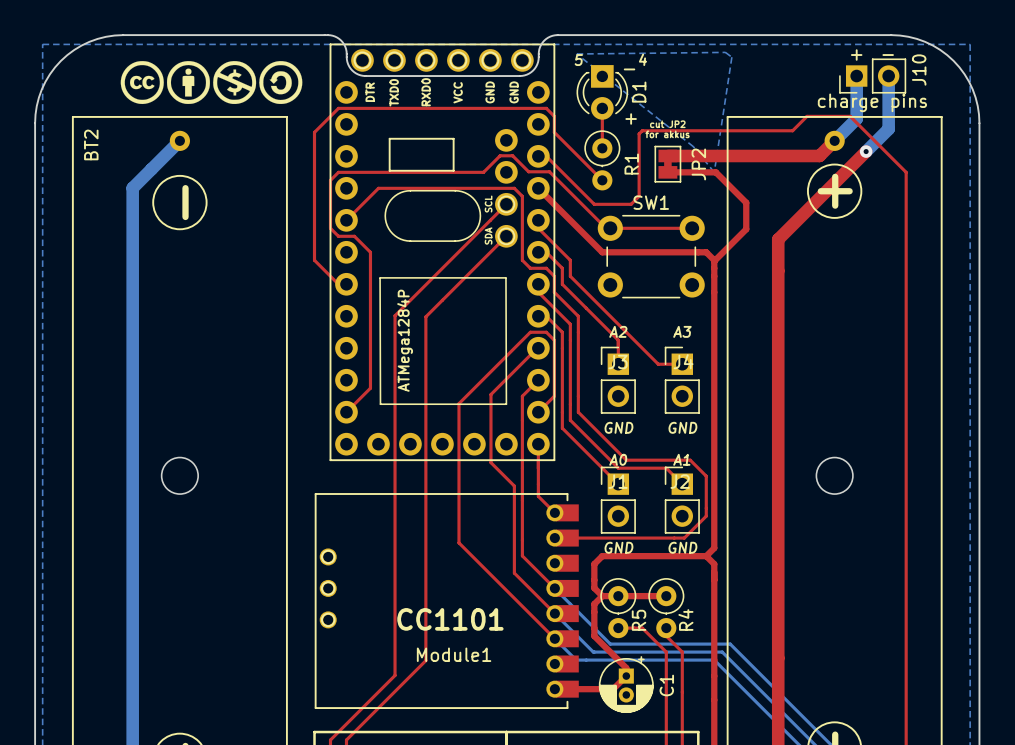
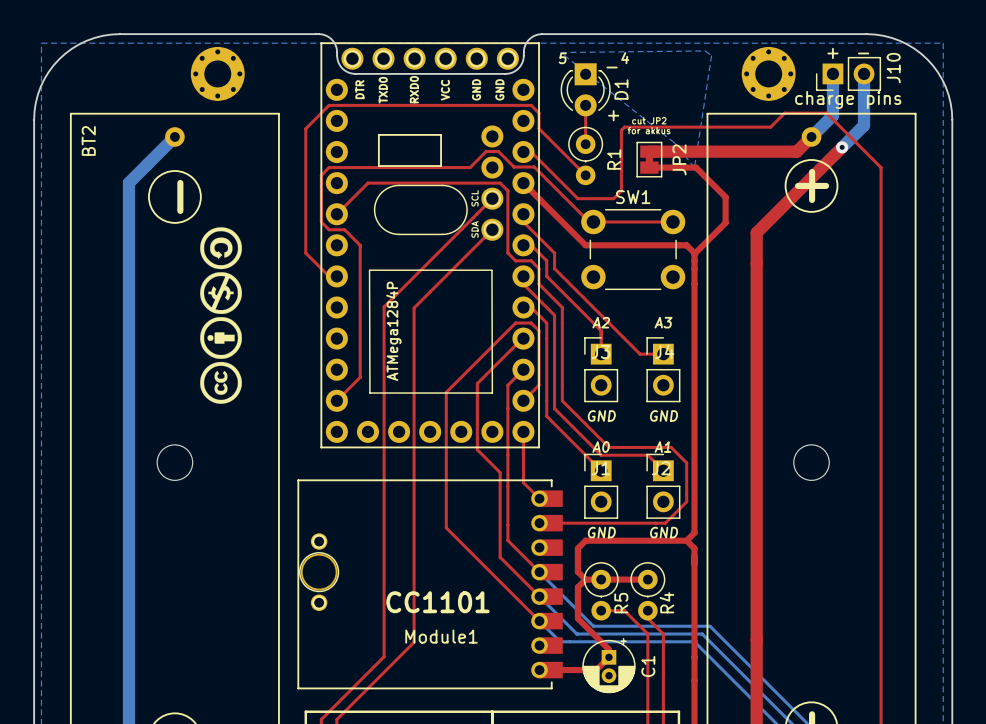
drawing: [120, 61, 303, 105] -> none
part: none -> (217, 73)
part: none -> (768, 73)
drawing: none -> [200, 227, 242, 404]
Module1 footprint: [314, 493, 579, 709] -> [297, 479, 563, 690]

